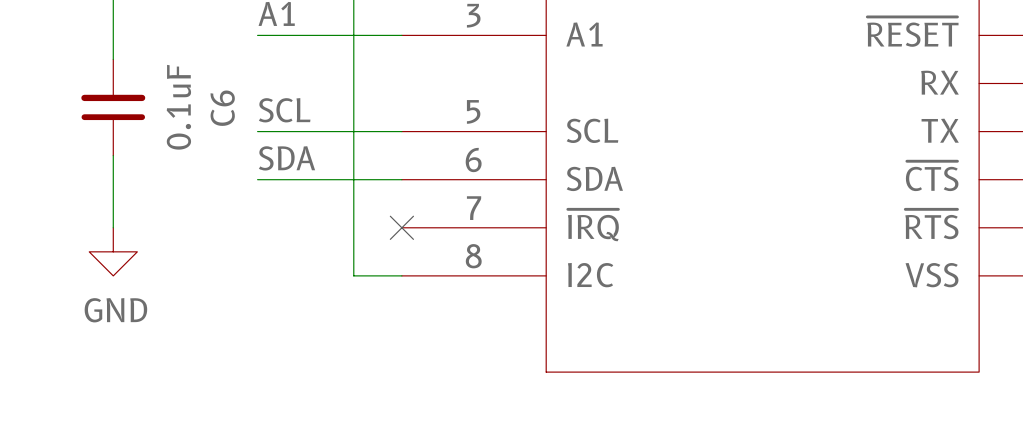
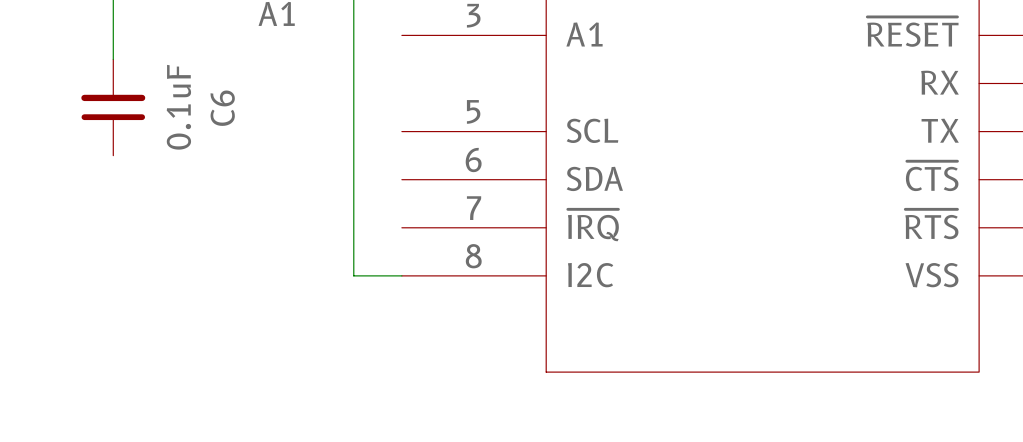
wire: (257, 35) (401, 35) -> none
label: SCL (284, 110) -> none
wire: (257, 131) (401, 131) -> none
wire: (113, 155) (113, 227) -> none
label: SDA (287, 158) -> none
wire: (257, 179) (401, 179) -> none
no-connect mark: (401, 227) -> none
power symbol: GND (113, 251) -> none

